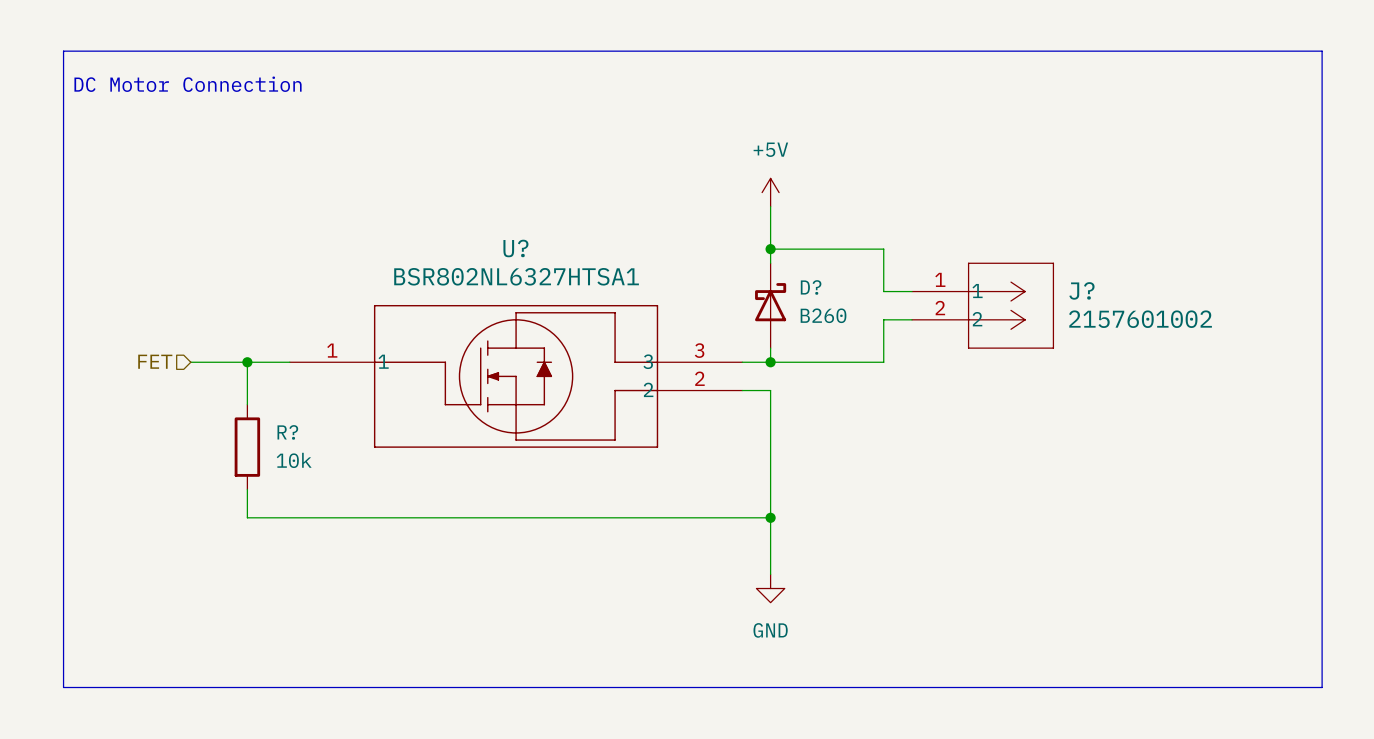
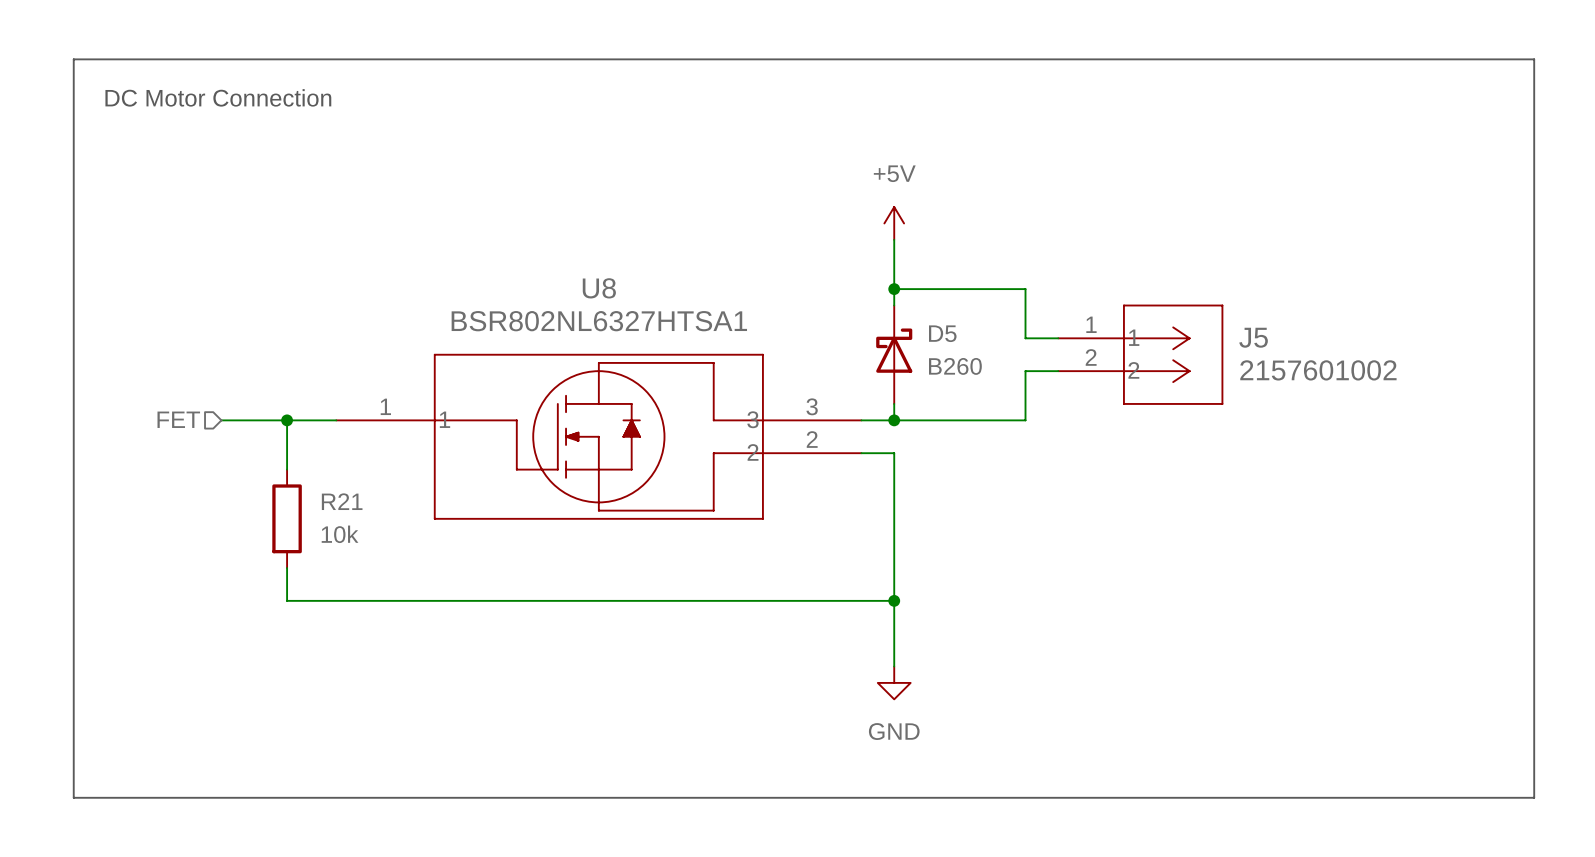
U? name: U? (515, 248) -> U8 (599, 288)
D? name: D? (811, 287) -> D5 (942, 333)
J? name: J? (1081, 290) -> J5 (1253, 337)
R? name: R? (287, 432) -> R21 (342, 501)

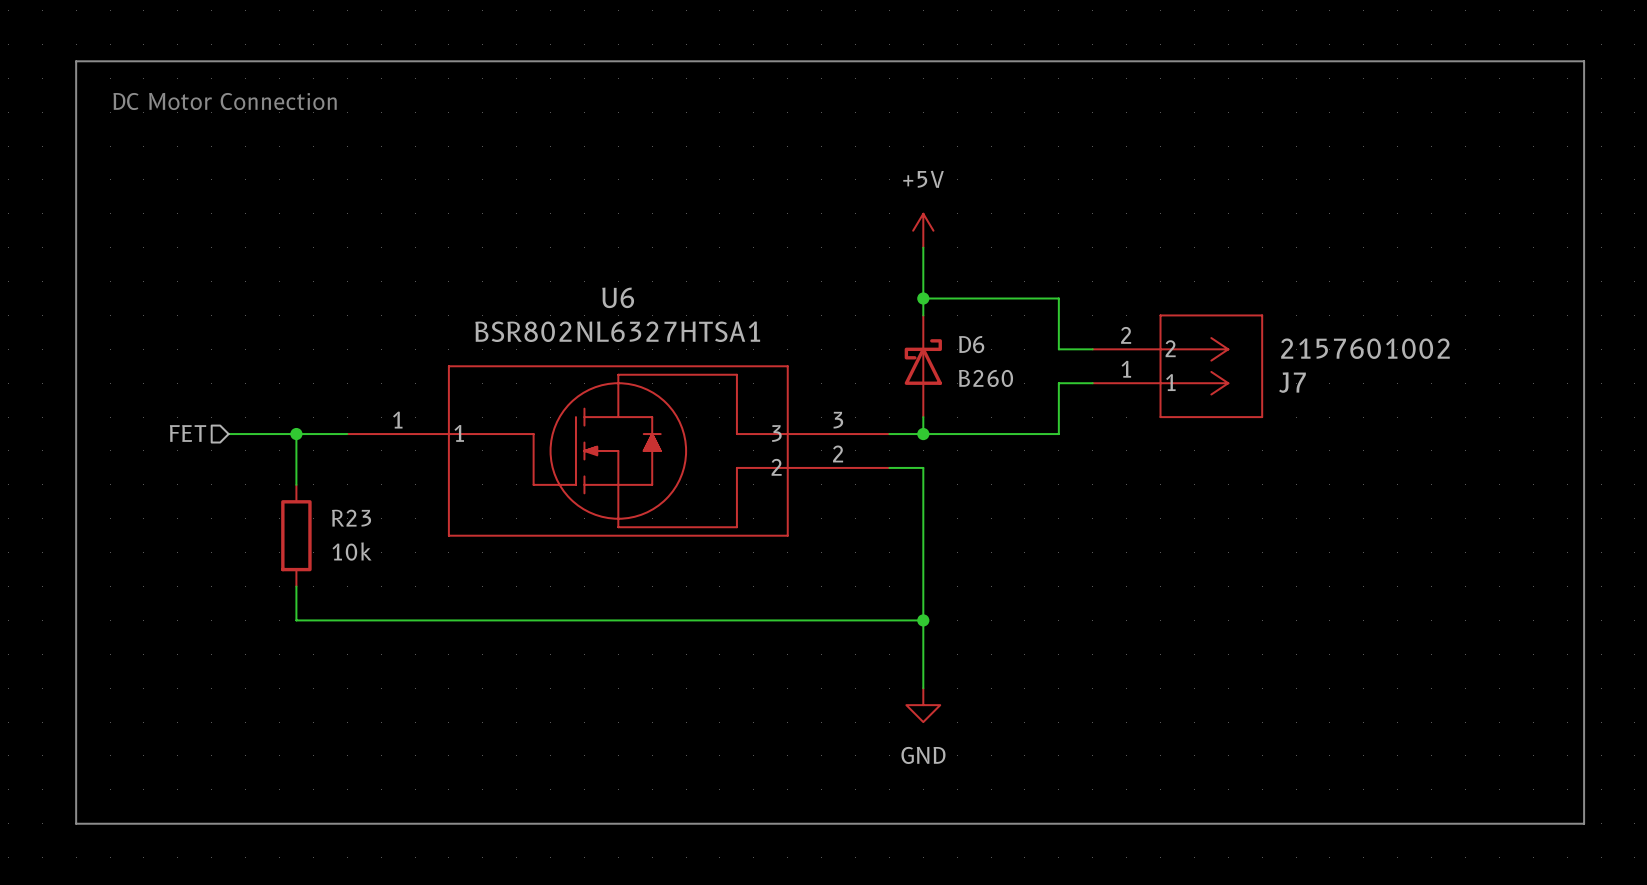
U8 name: U8 (599, 288) -> U6 (618, 297)
D5 name: D5 (942, 333) -> D6 (971, 344)
J5 name: J5 (1253, 337) -> J7 (1292, 382)
J5 flip: as is (1173, 354) -> up-down (1211, 366)
R21 name: R21 (342, 501) -> R23 (351, 518)

